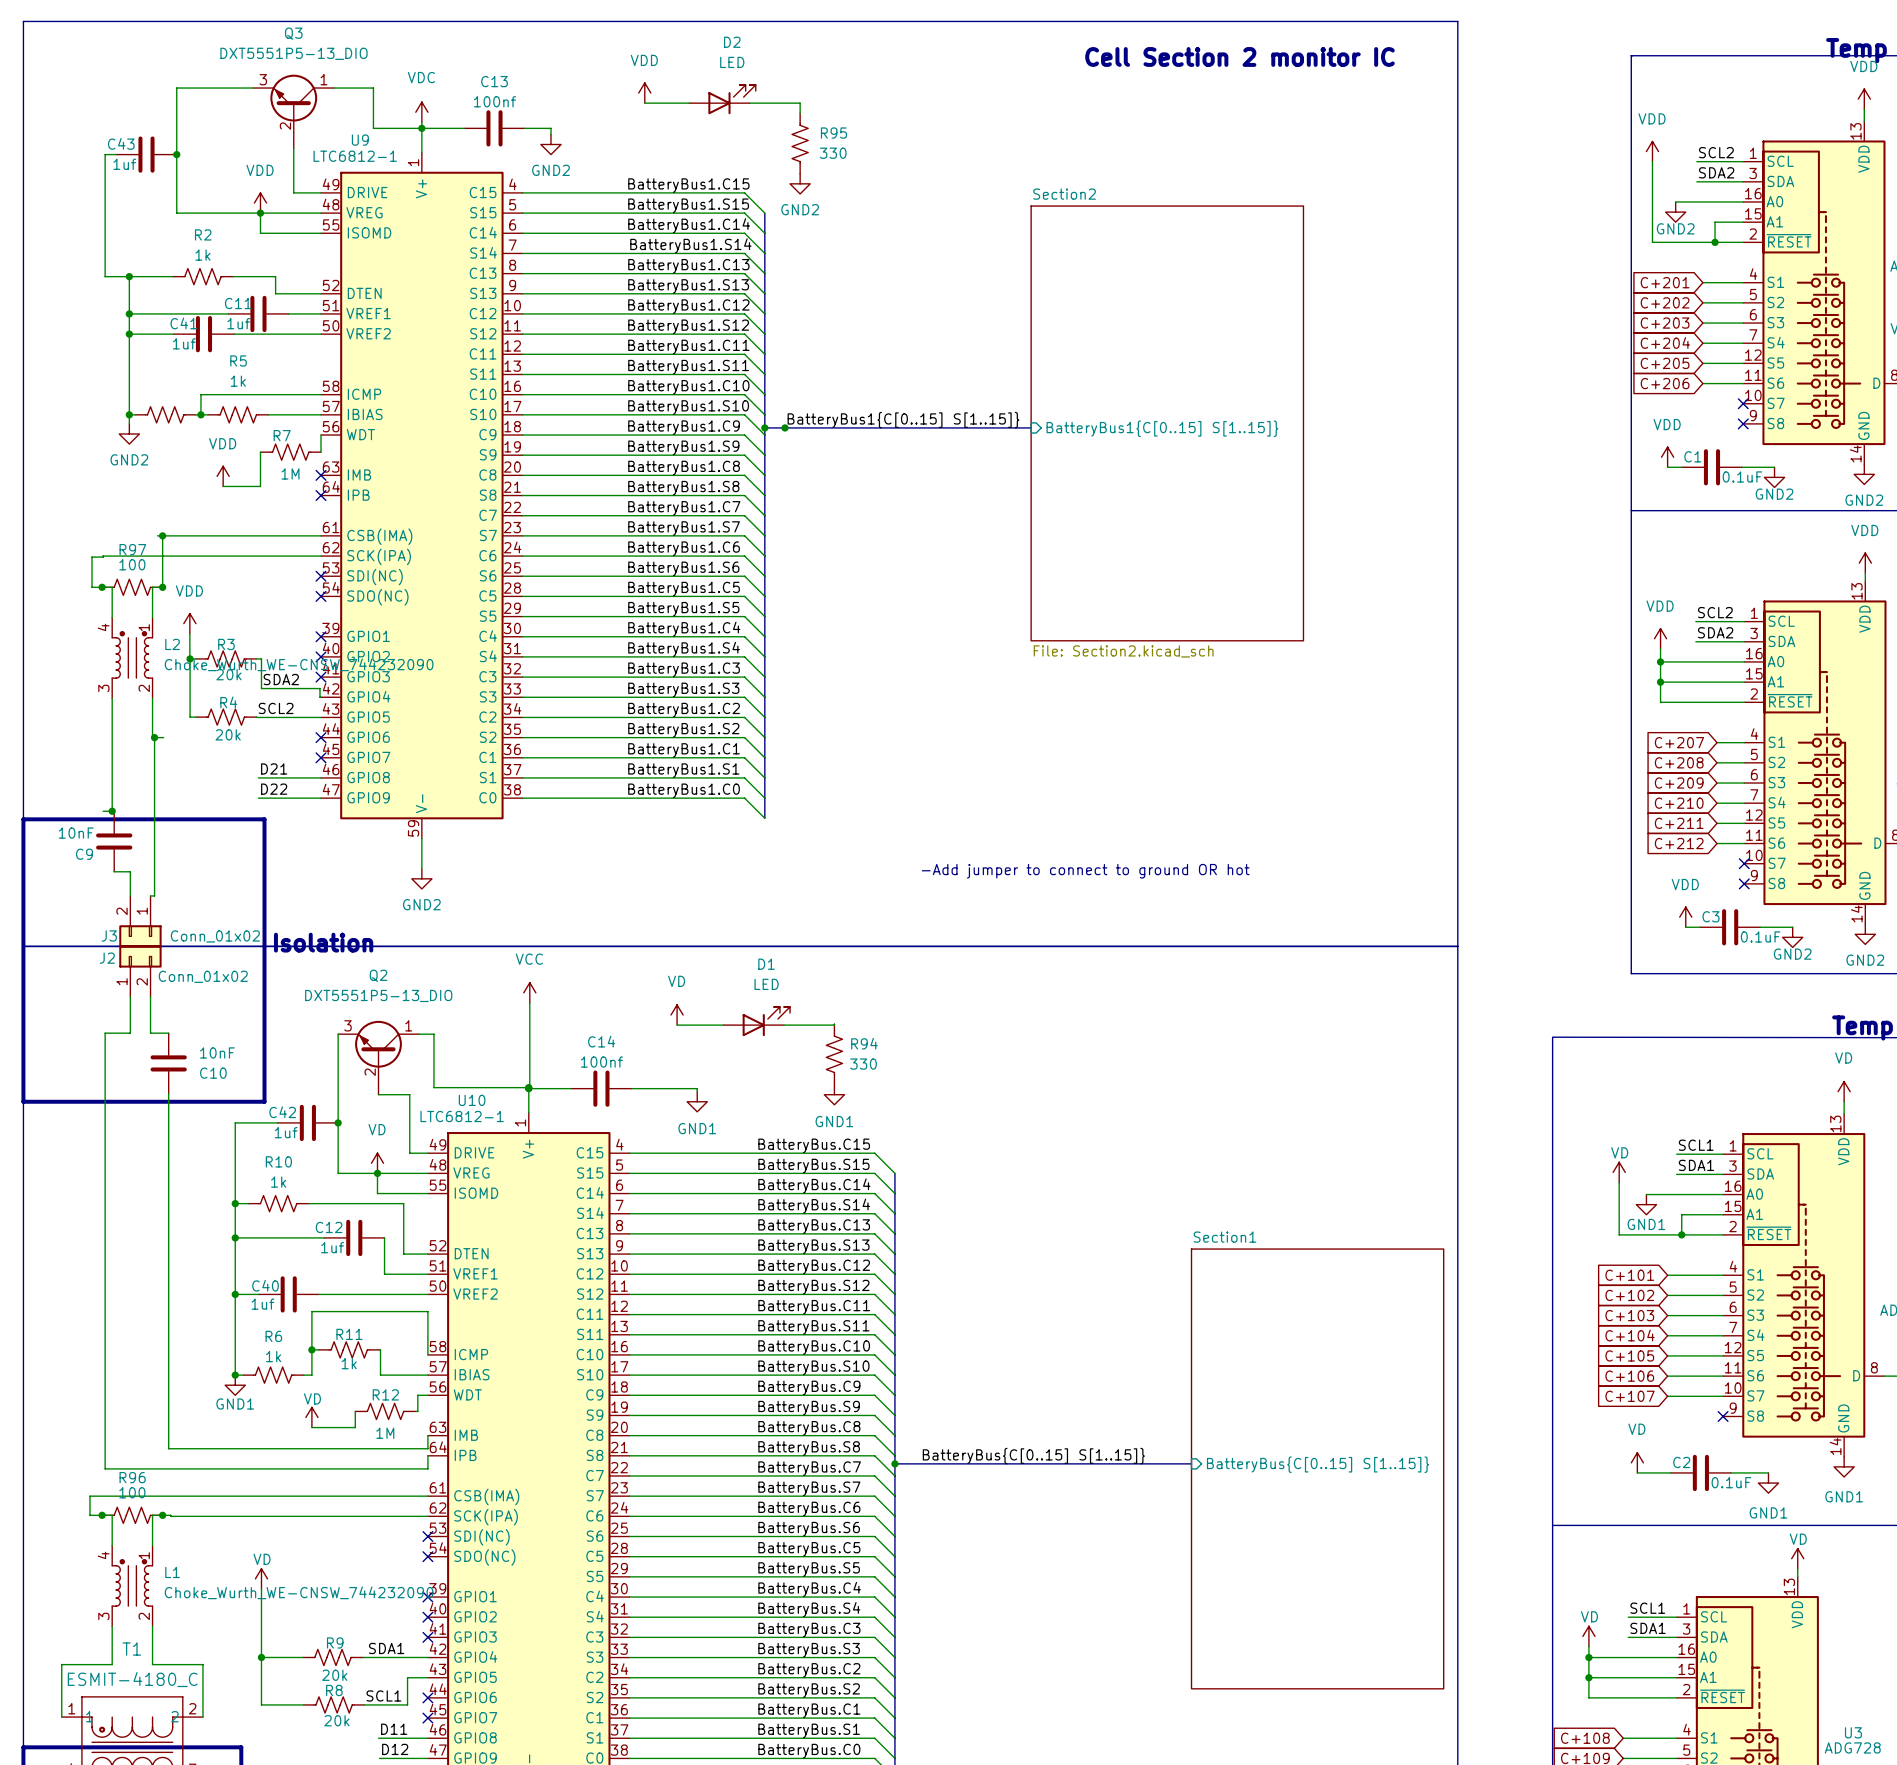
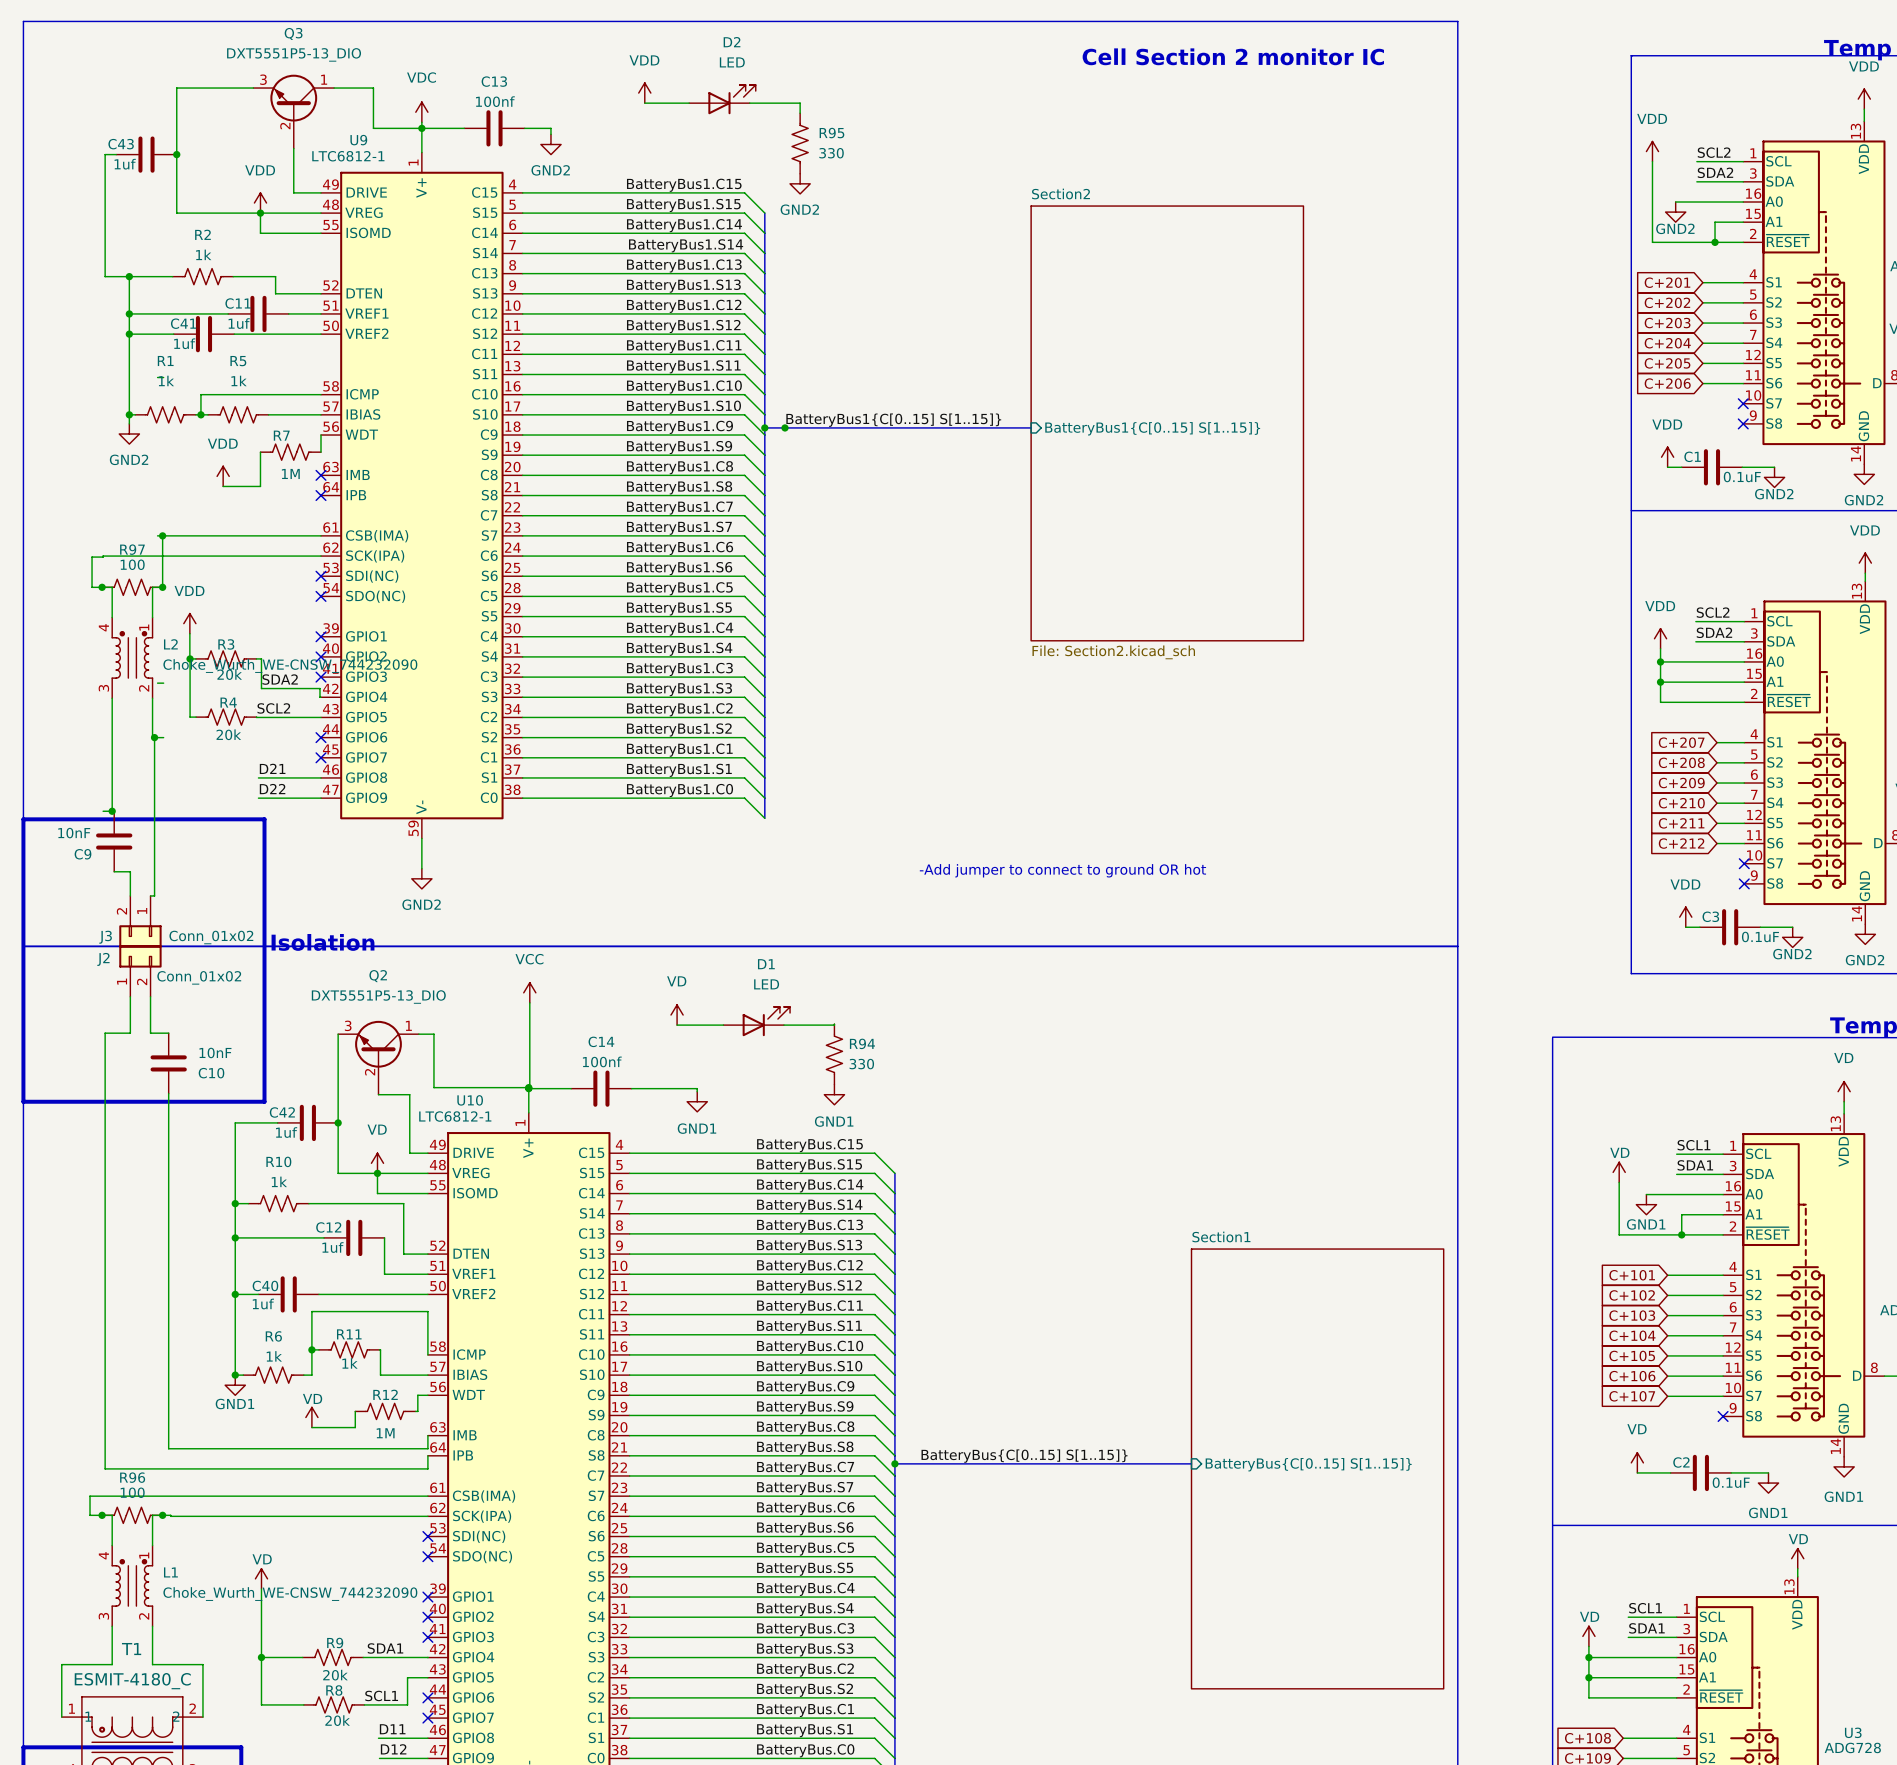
R1 name: none -> R1 (165, 361)
wire: none -> (157, 377) (163, 377)
R1 value: none -> 1k (166, 380)
wire: none -> (157, 683) (163, 683)

